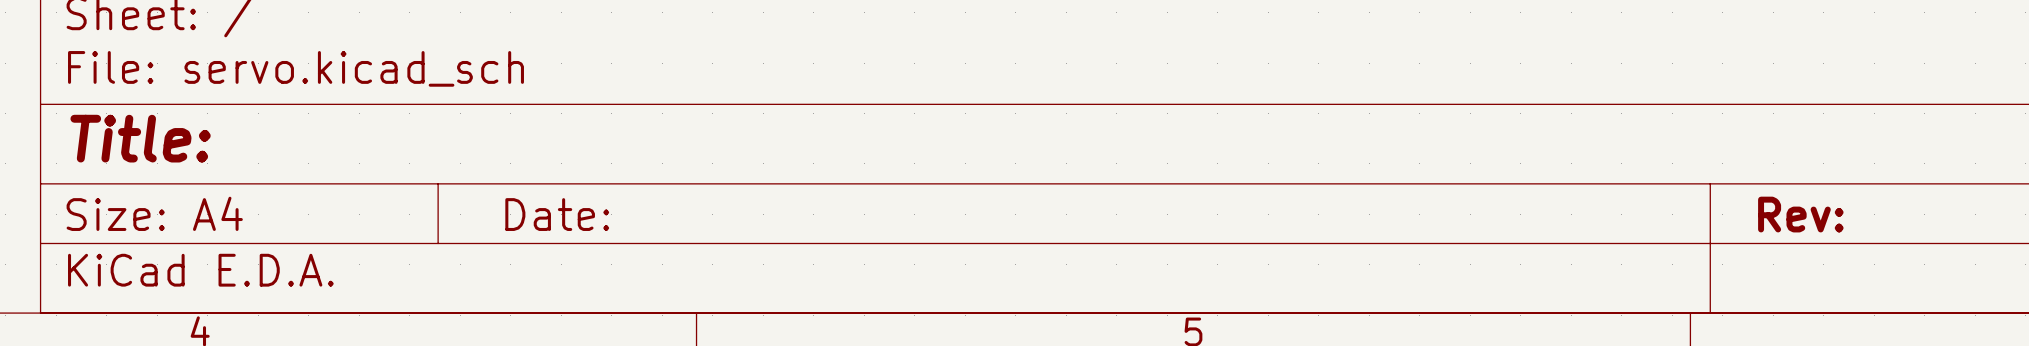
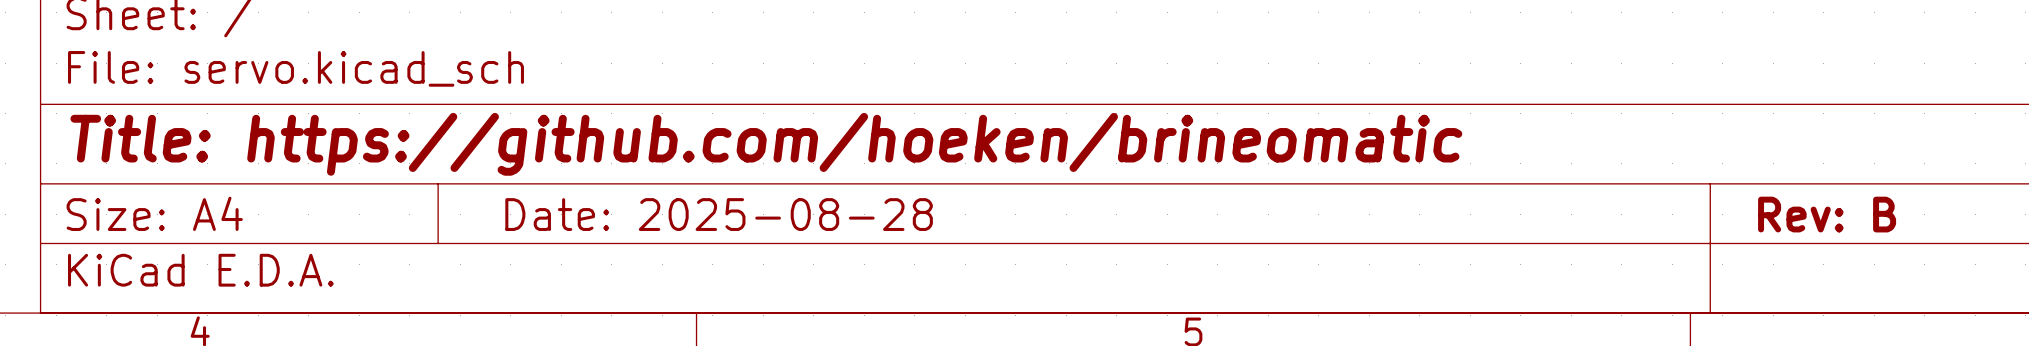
title block: Title: (140, 138) -> Title: https://github.com/hoeken/brineomatic (766, 144)
title block: Date: (557, 214) -> Date: 2025-08-28 (719, 214)
title block: Rev: (1800, 214) -> Rev: B (1827, 214)

